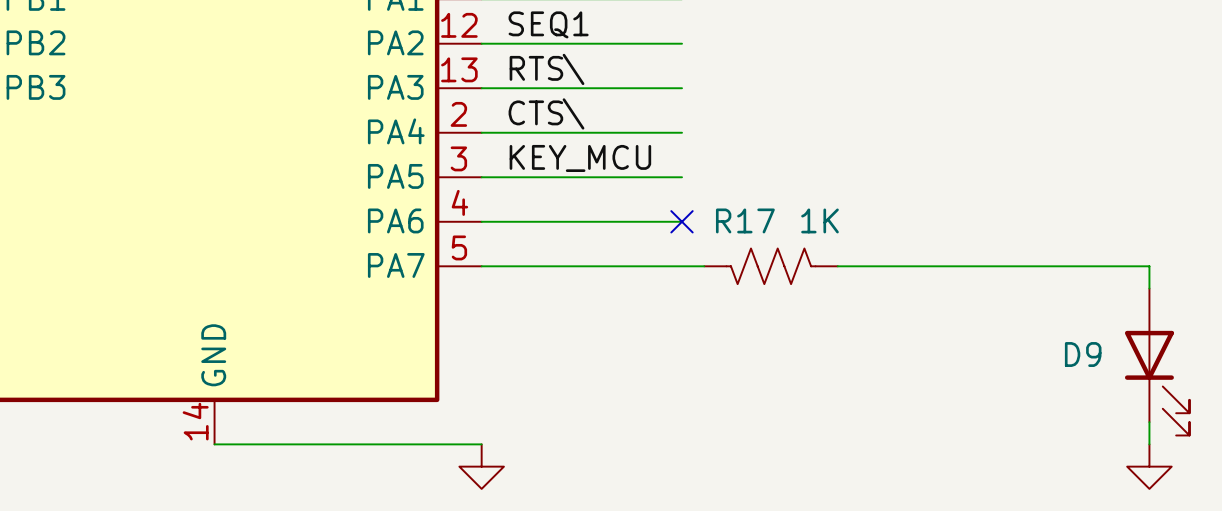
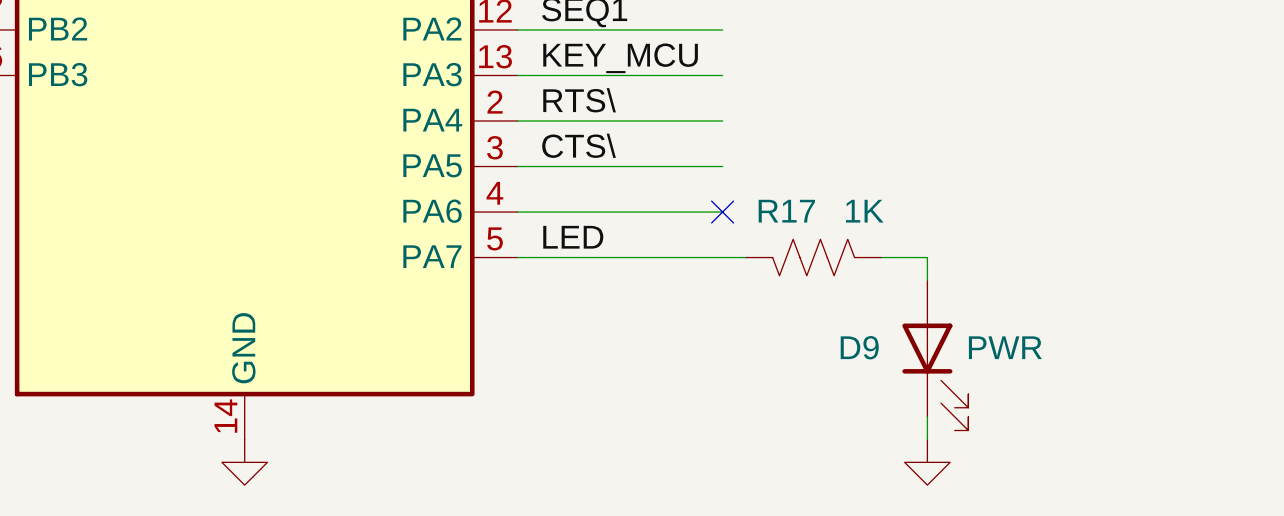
label: RTS\ (547, 69) -> KEY_MCU (620, 58)
label: CTS\ (546, 113) -> RTS\ (579, 100)
label: KEY_MCU (580, 158) -> CTS\ (579, 145)
label: none -> LED (573, 237)
wire: (882, 266) (1149, 266) (1149, 288) -> (927, 257) (927, 280)
D9 value: none -> PWR (1005, 347)
D9 position: (1157, 362) -> (935, 355)
wire: (1149, 422) (1149, 444) -> (927, 416) (927, 439)
wire: (214, 444) (481, 444) -> none
power symbol: none -> (244, 462)
power symbol: (481, 466) -> none
power symbol: none -> (927, 462)
power symbol: (1149, 466) -> none

